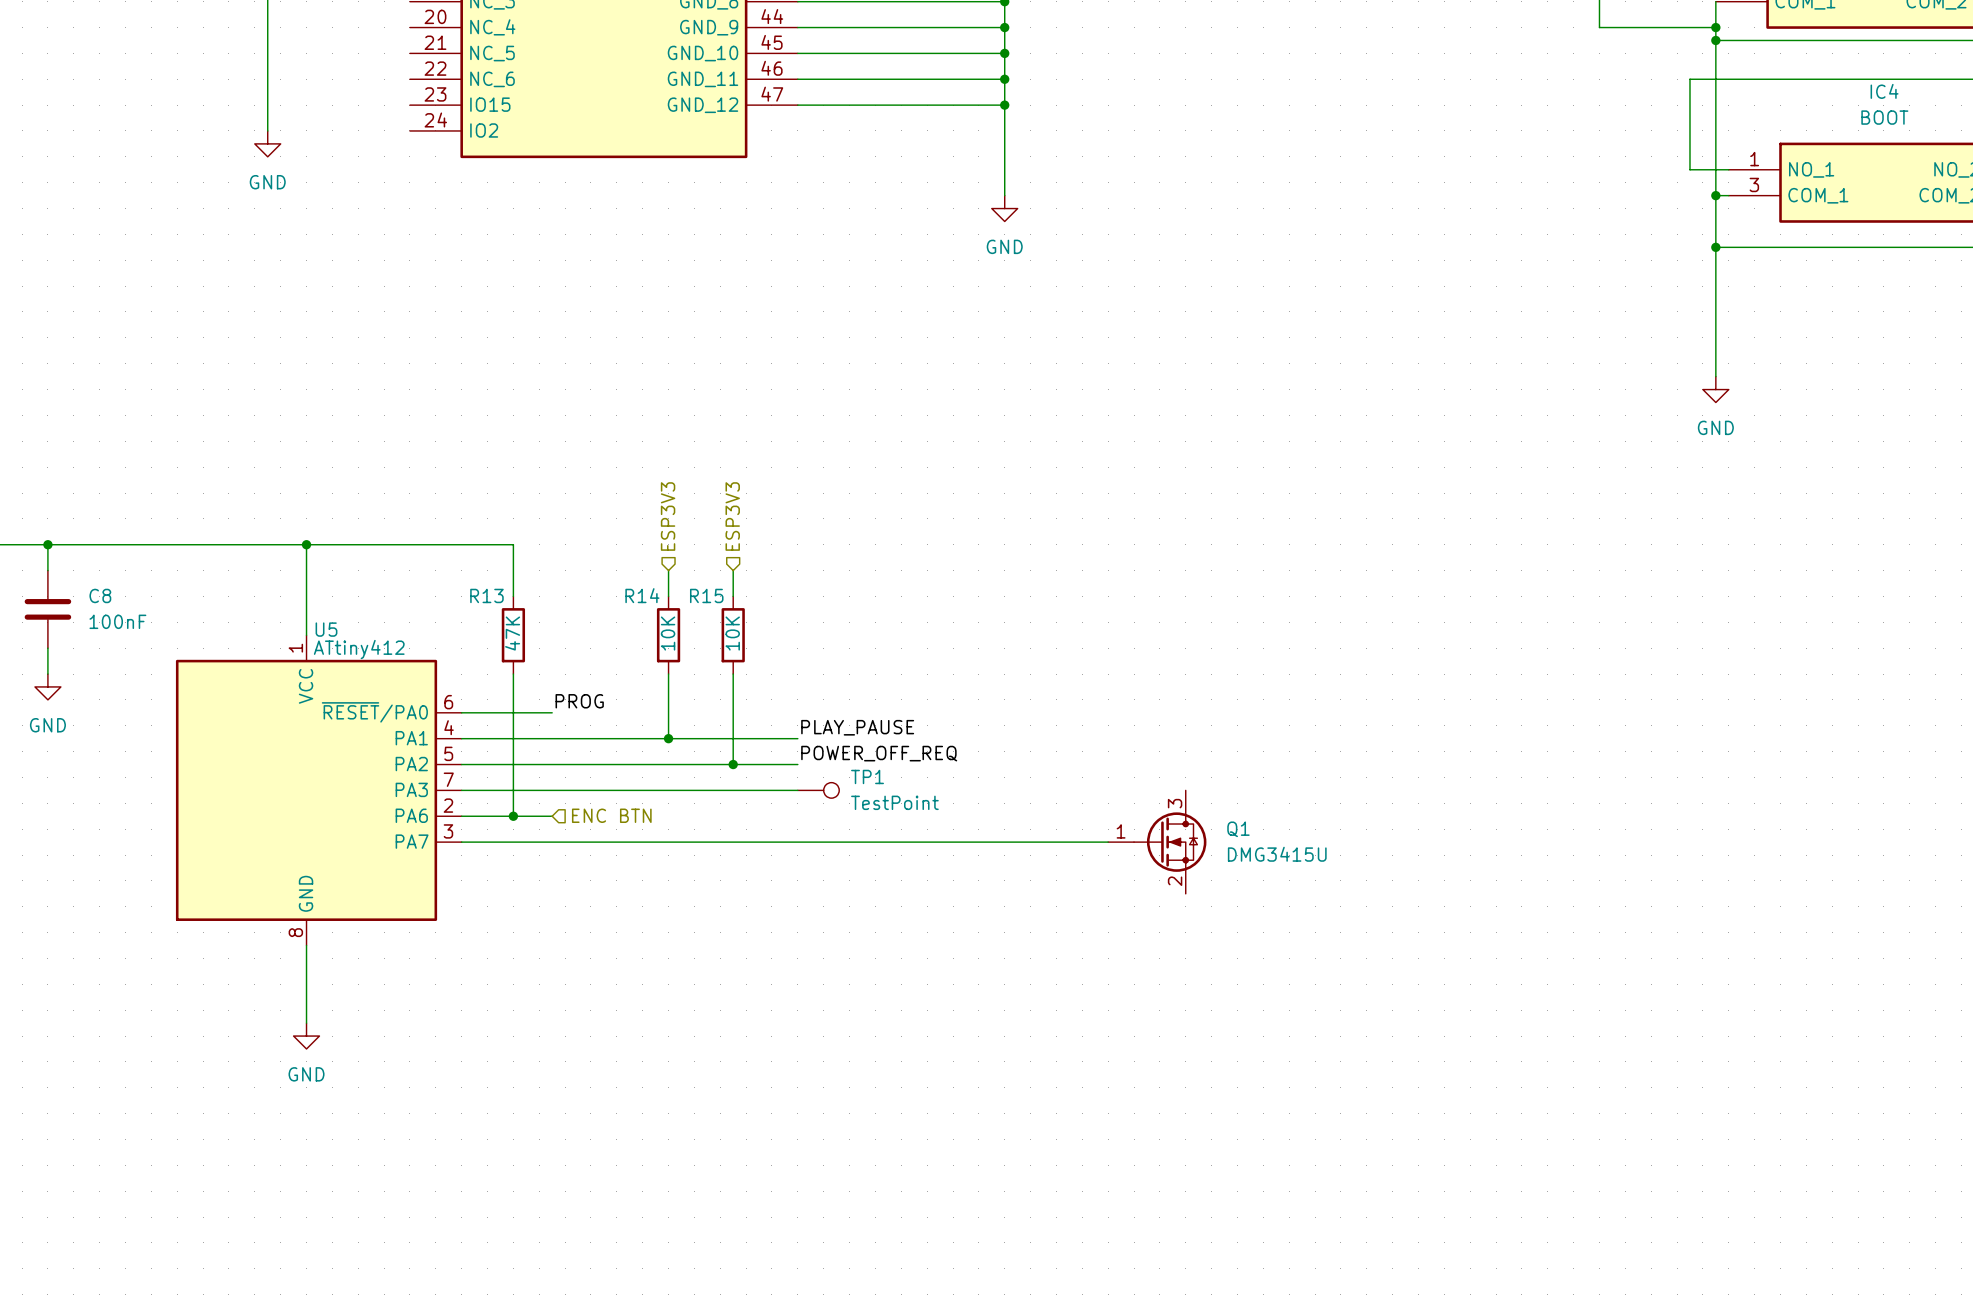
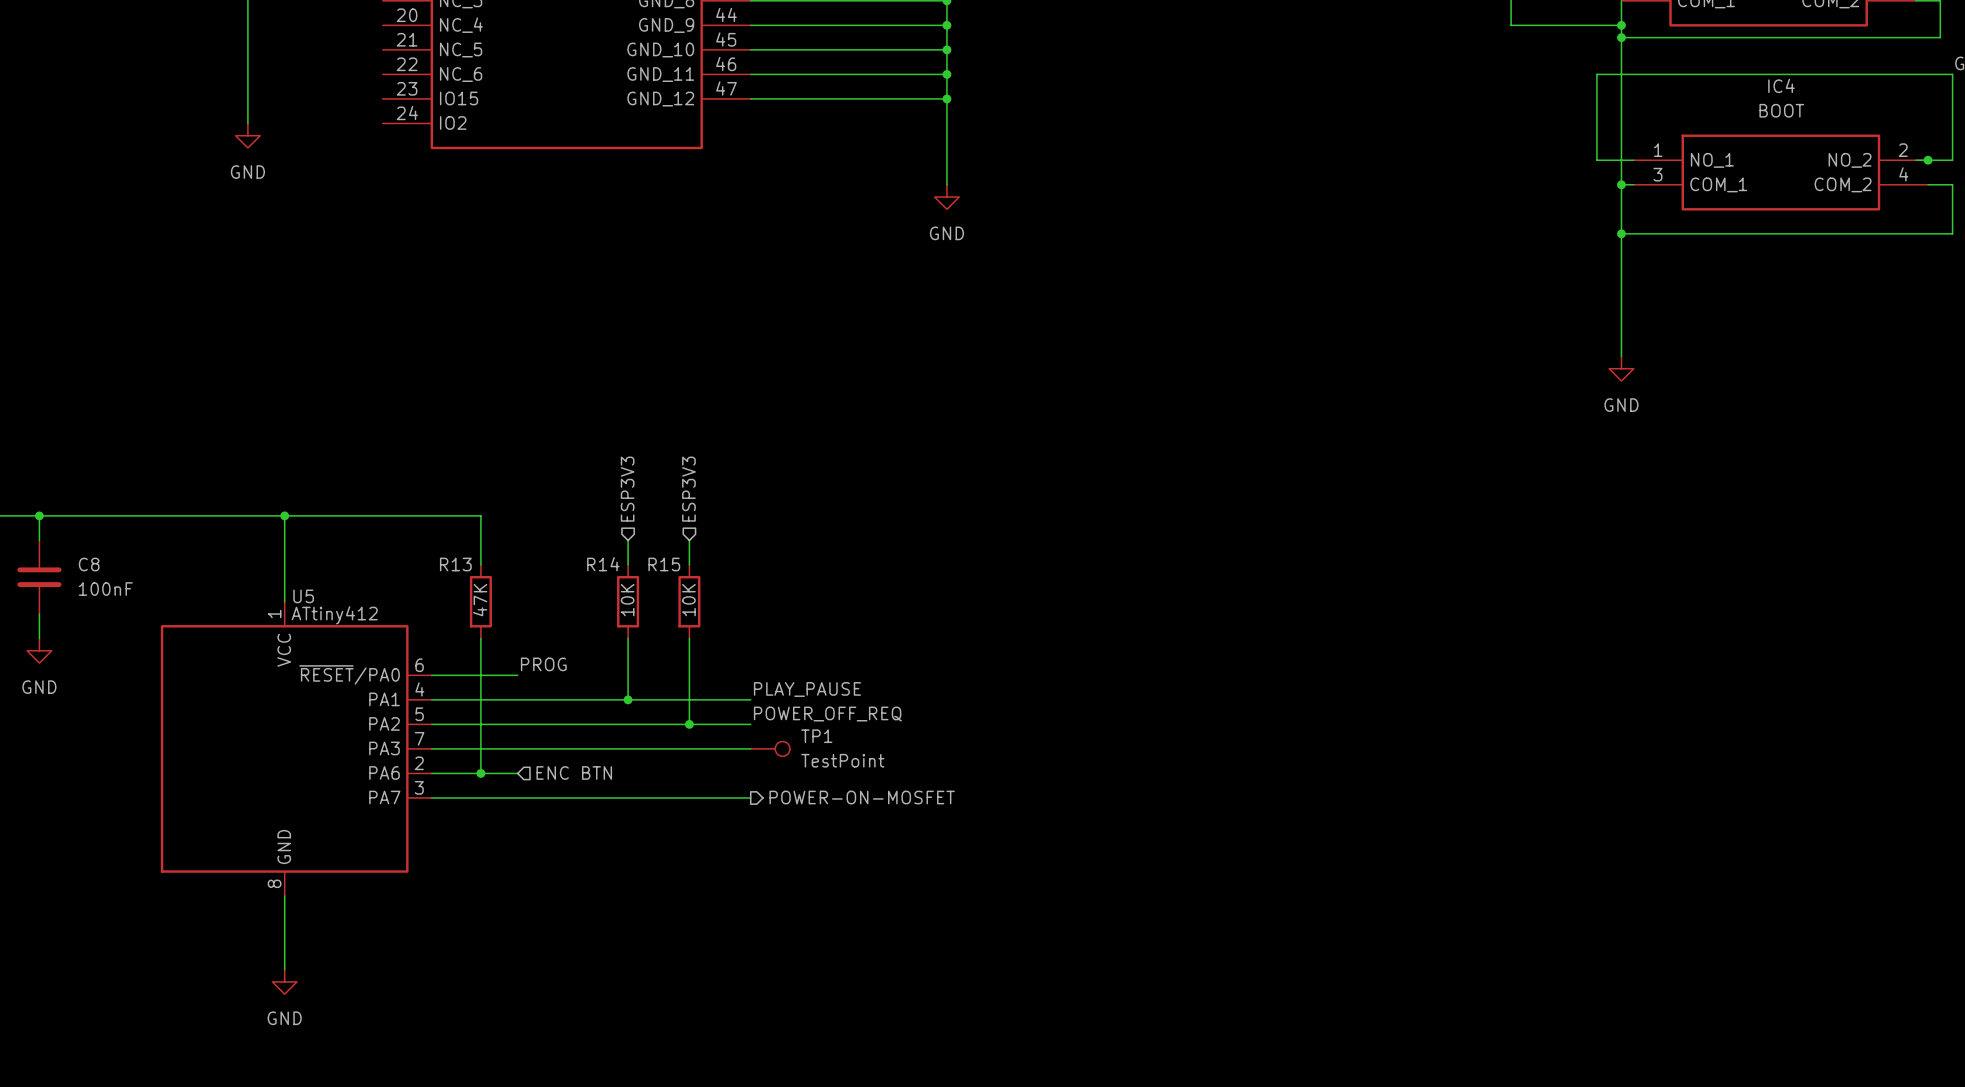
hierarchical label: none -> POWER-ON-MOSFET (862, 797)
wire: (797, 842) (1108, 842) -> none
Q1: DMG3415U (1157, 842) -> none

